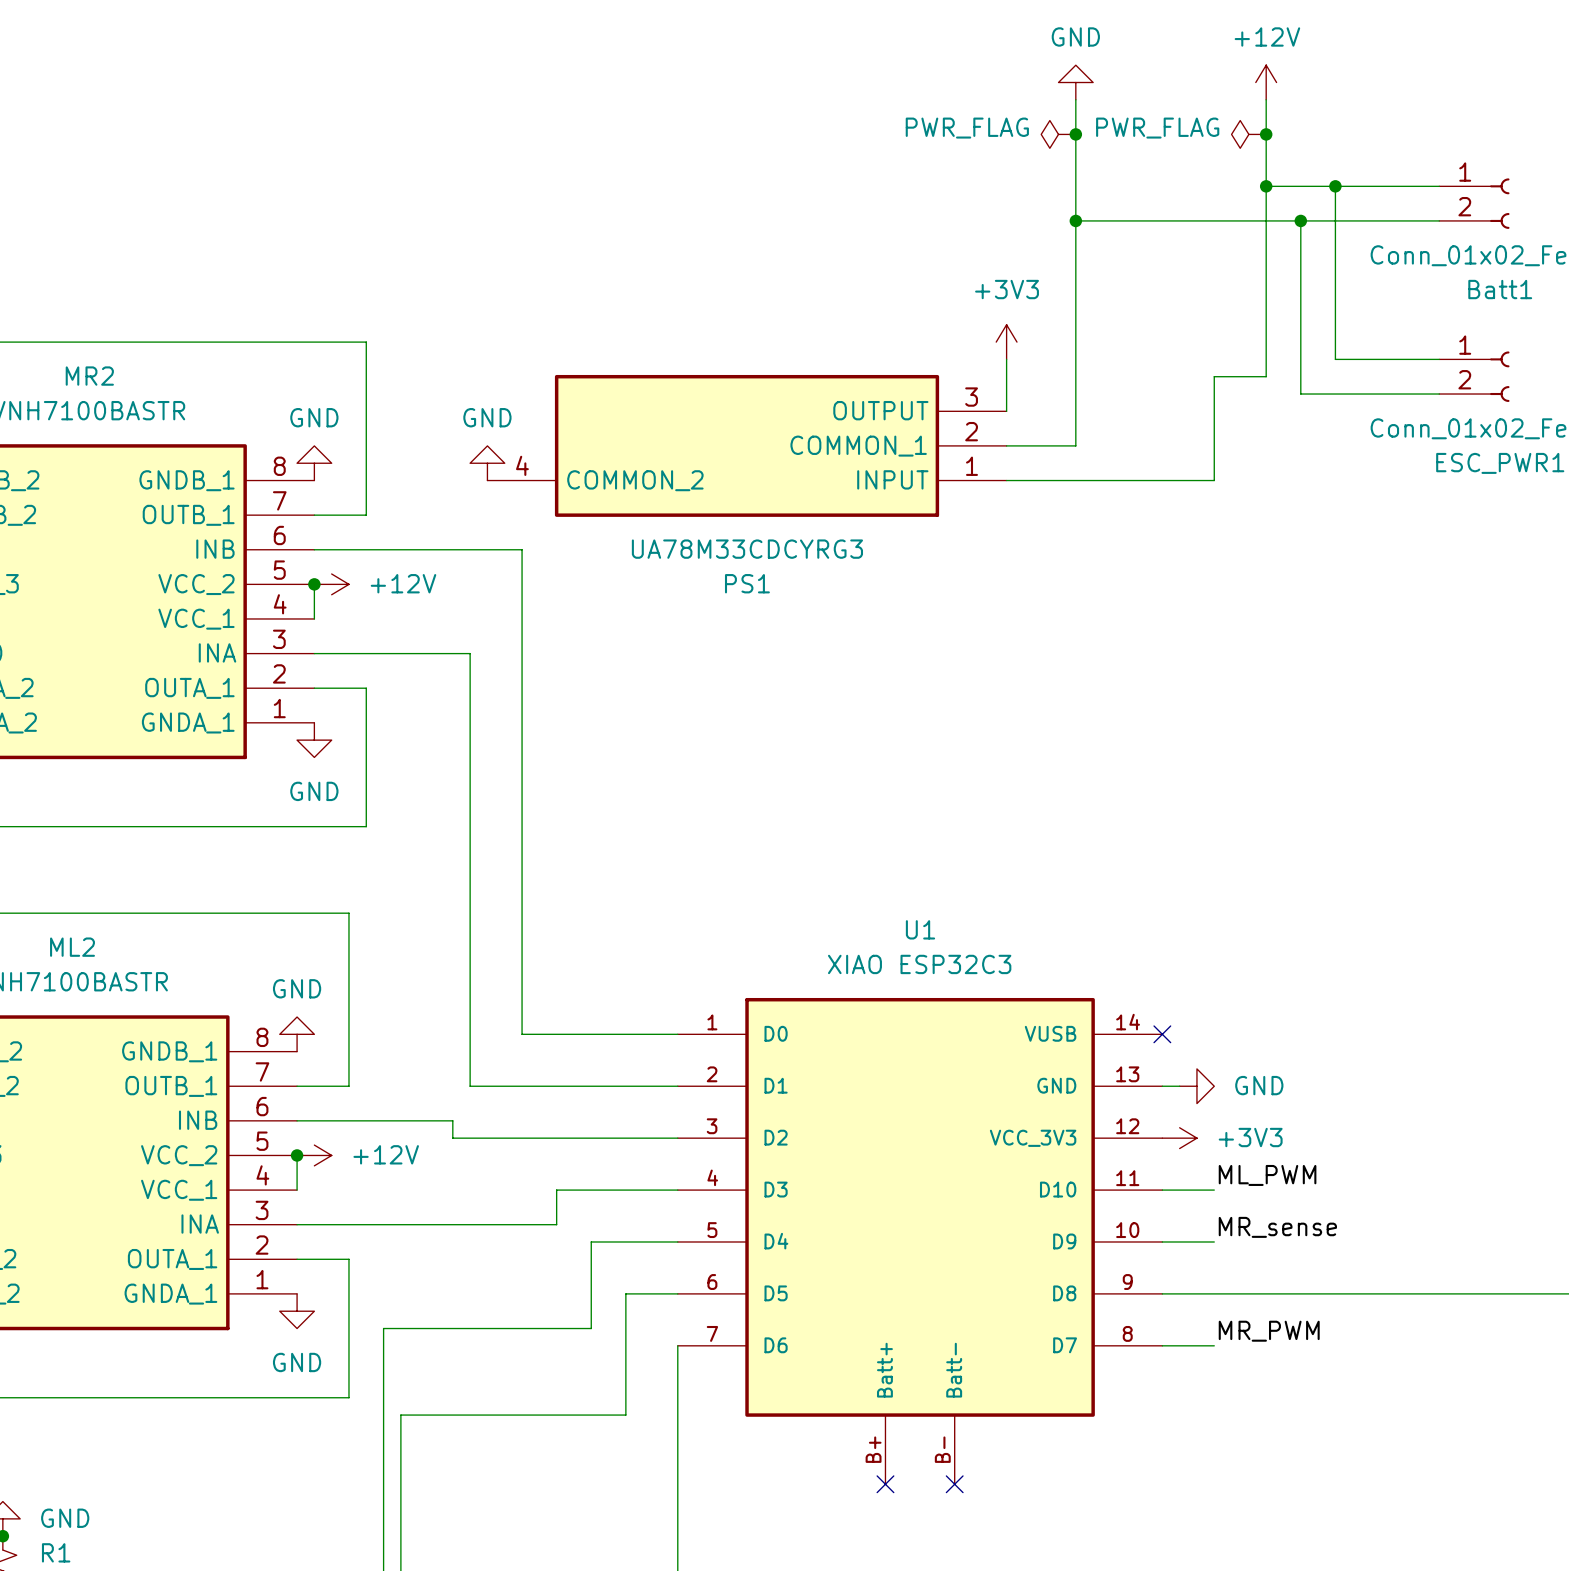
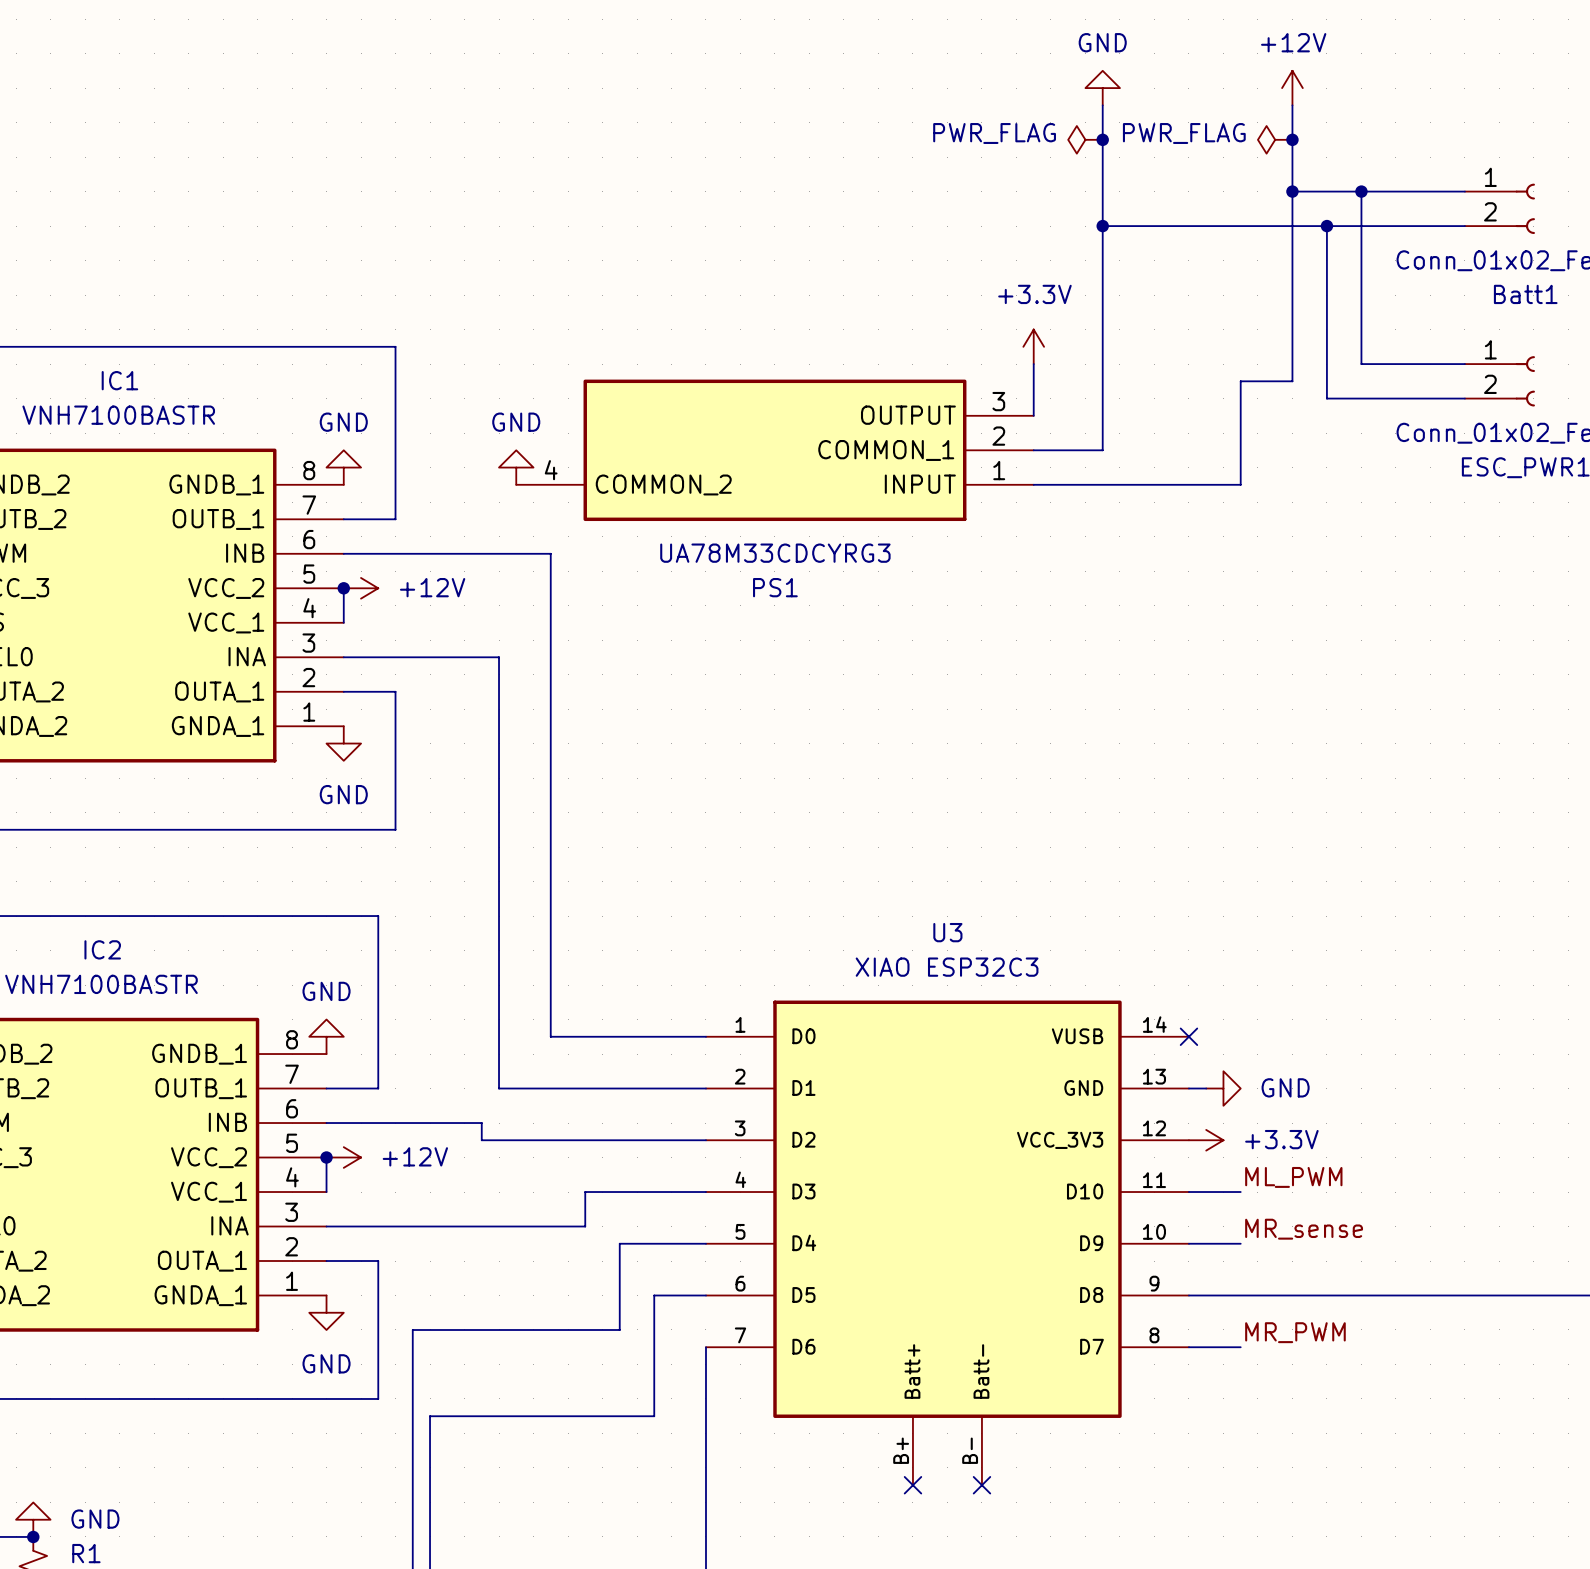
power symbol: +3V3 (1006, 342) -> +3.3V (1033, 346)
MR2 name: MR2 (89, 376) -> IC1 (119, 380)
U1 name: U1 (920, 929) -> U3 (947, 932)
ML2 name: ML2 (72, 947) -> IC2 (102, 949)
power symbol: +3V3 (1179, 1138) -> +3.3V (1206, 1140)

